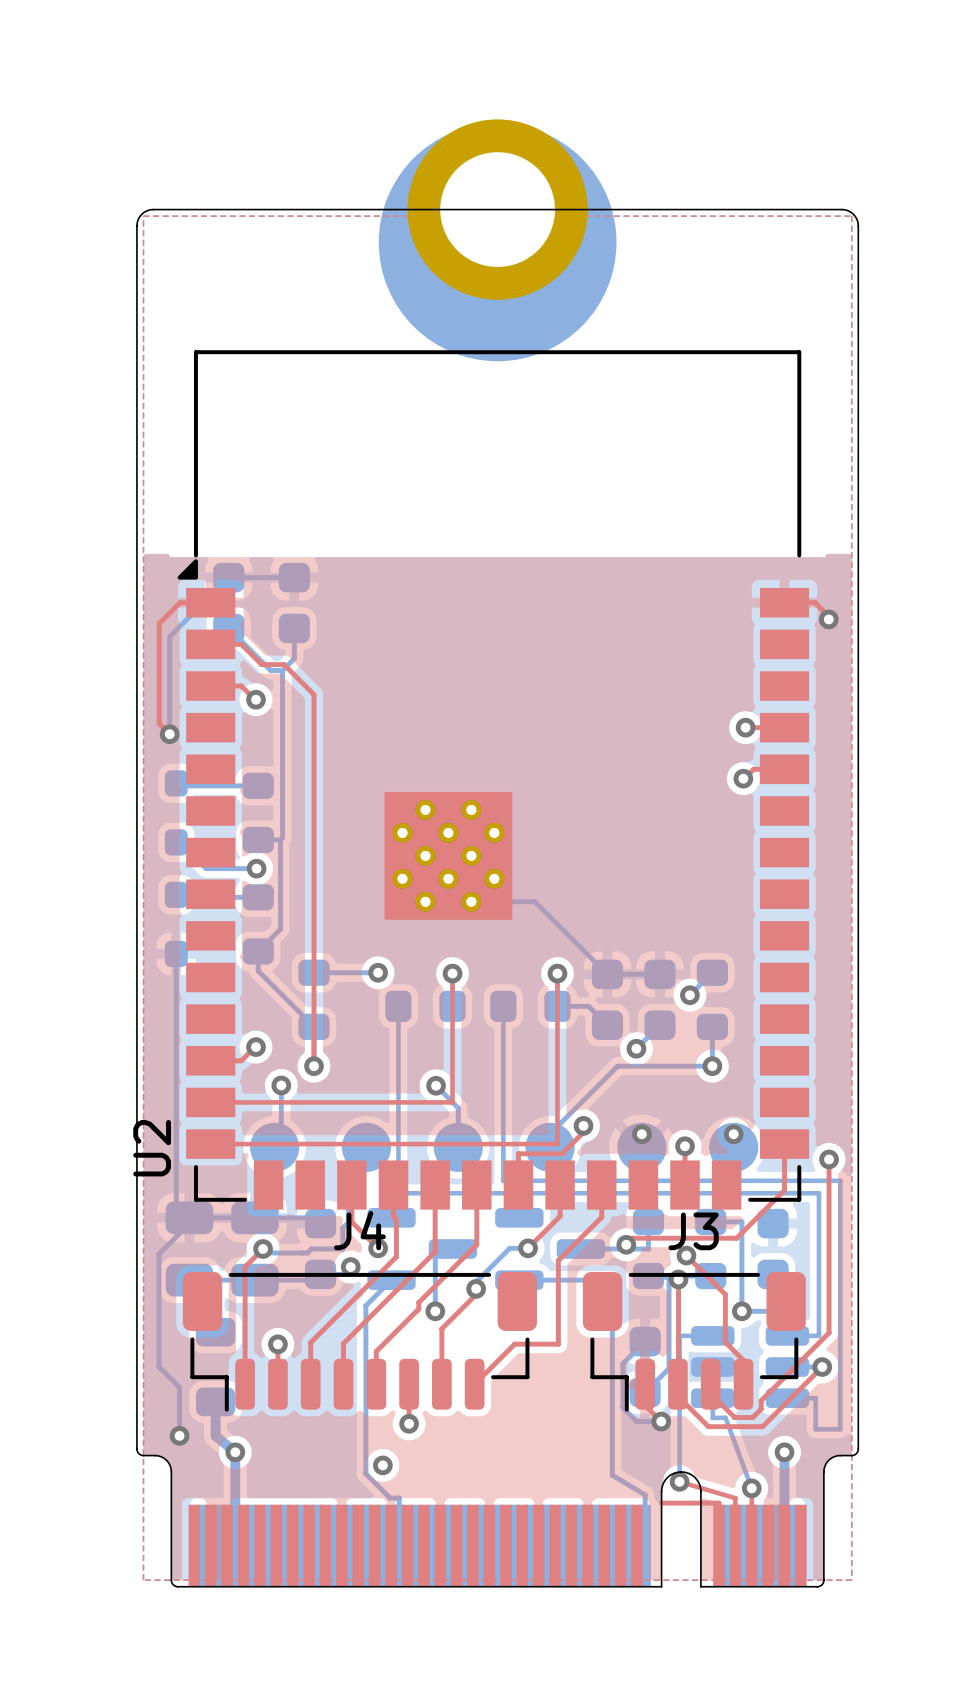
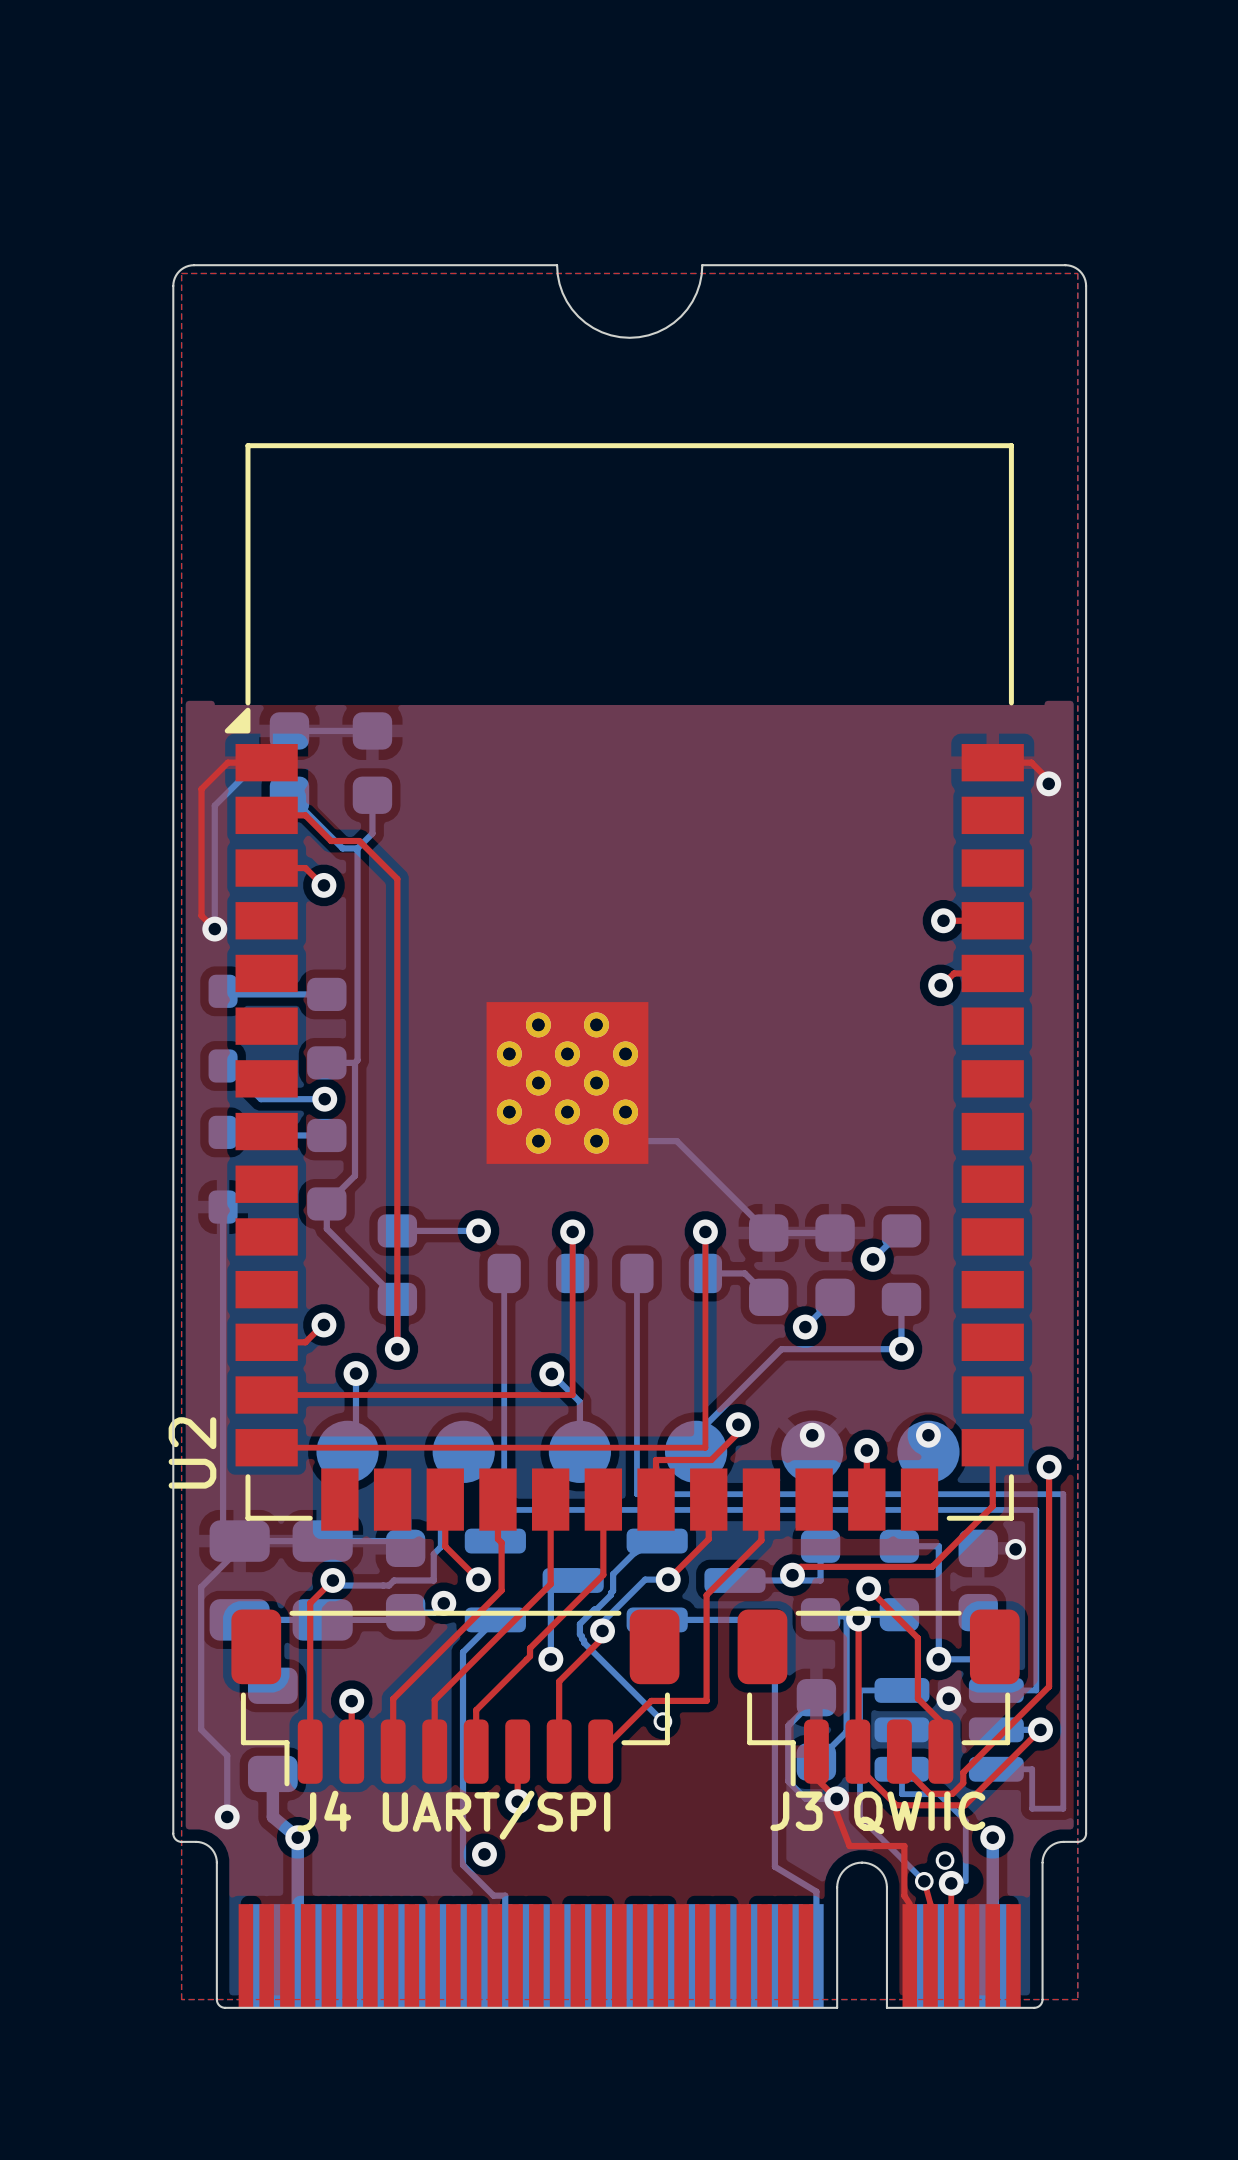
part: (497, 853) -> none
part: none -> (629, 1136)
bottom track: none -> (657, 1541) (633, 1553) (613, 1574) (613, 1590) (611, 1595) (579, 1624) (579, 1634) (584, 1642) (662, 1721)
via: none -> (1015, 1549)
J4 name: J4 (359, 1230) -> none
J3 name: J3 (693, 1231) -> none
via: none -> (662, 1721)
bottom track: (725, 1417) (751, 1488) -> (918, 1794) (938, 1794) (965, 1821) (965, 1881)
text: none -> J3 QWIIC (877, 1812)
text: none -> J4 UART/SPI (453, 1815)
bottom track: (679, 1435) (679, 1481) -> (859, 1816) (924, 1881)
via: none -> (945, 1860)
top track: (679, 1481) (735, 1498) (735, 1504) -> (924, 1881) (930, 1904)
via position: (679, 1481) -> (948, 1698)
via: none -> (924, 1881)
top track: (661, 1503) (718, 1503) (718, 1504) -> (836, 1798) (836, 1812) (849, 1846) (904, 1846) (904, 1895) (909, 1904)

